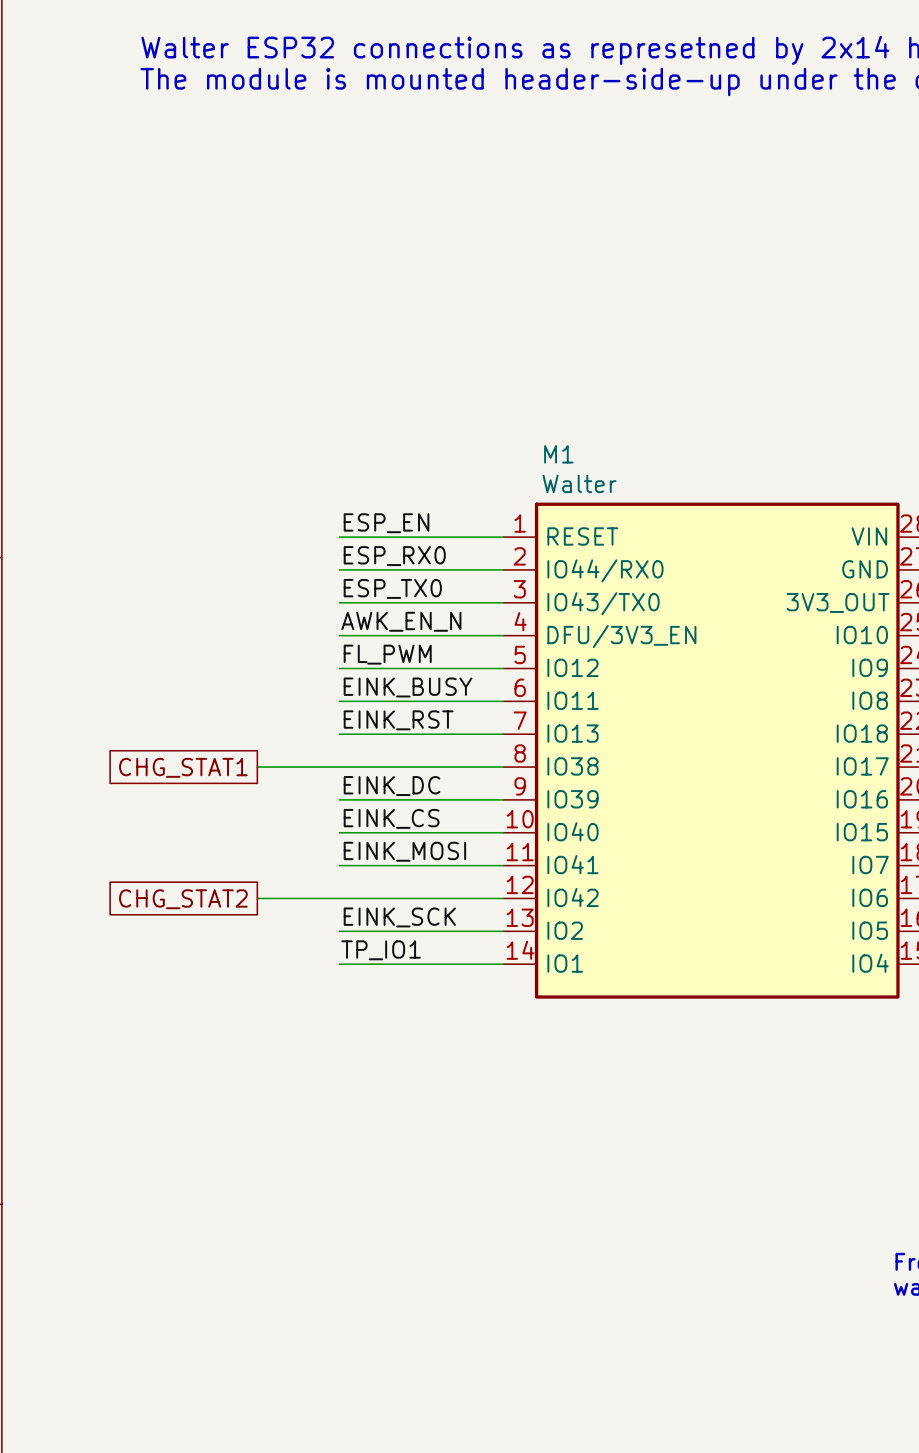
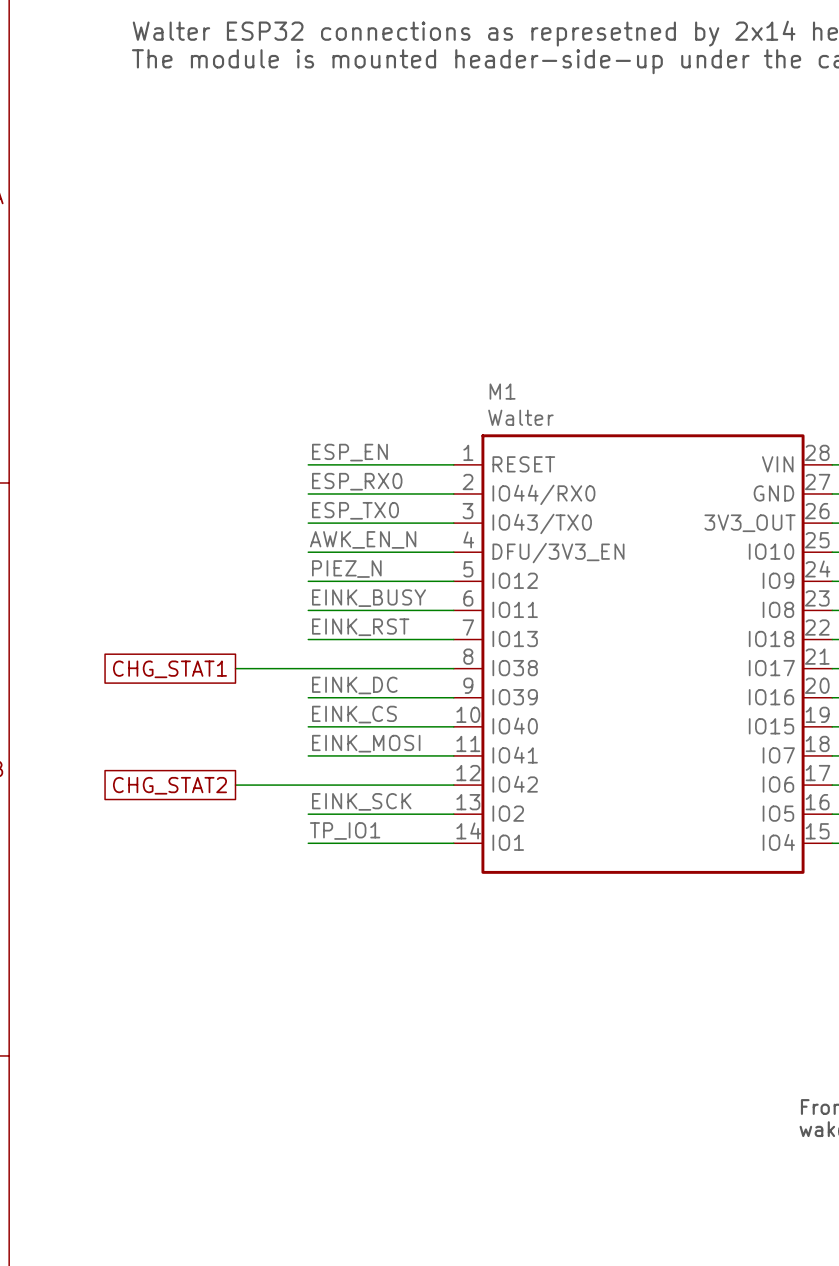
label: FL_PWM (387, 654) -> PIEZ_N (346, 569)

